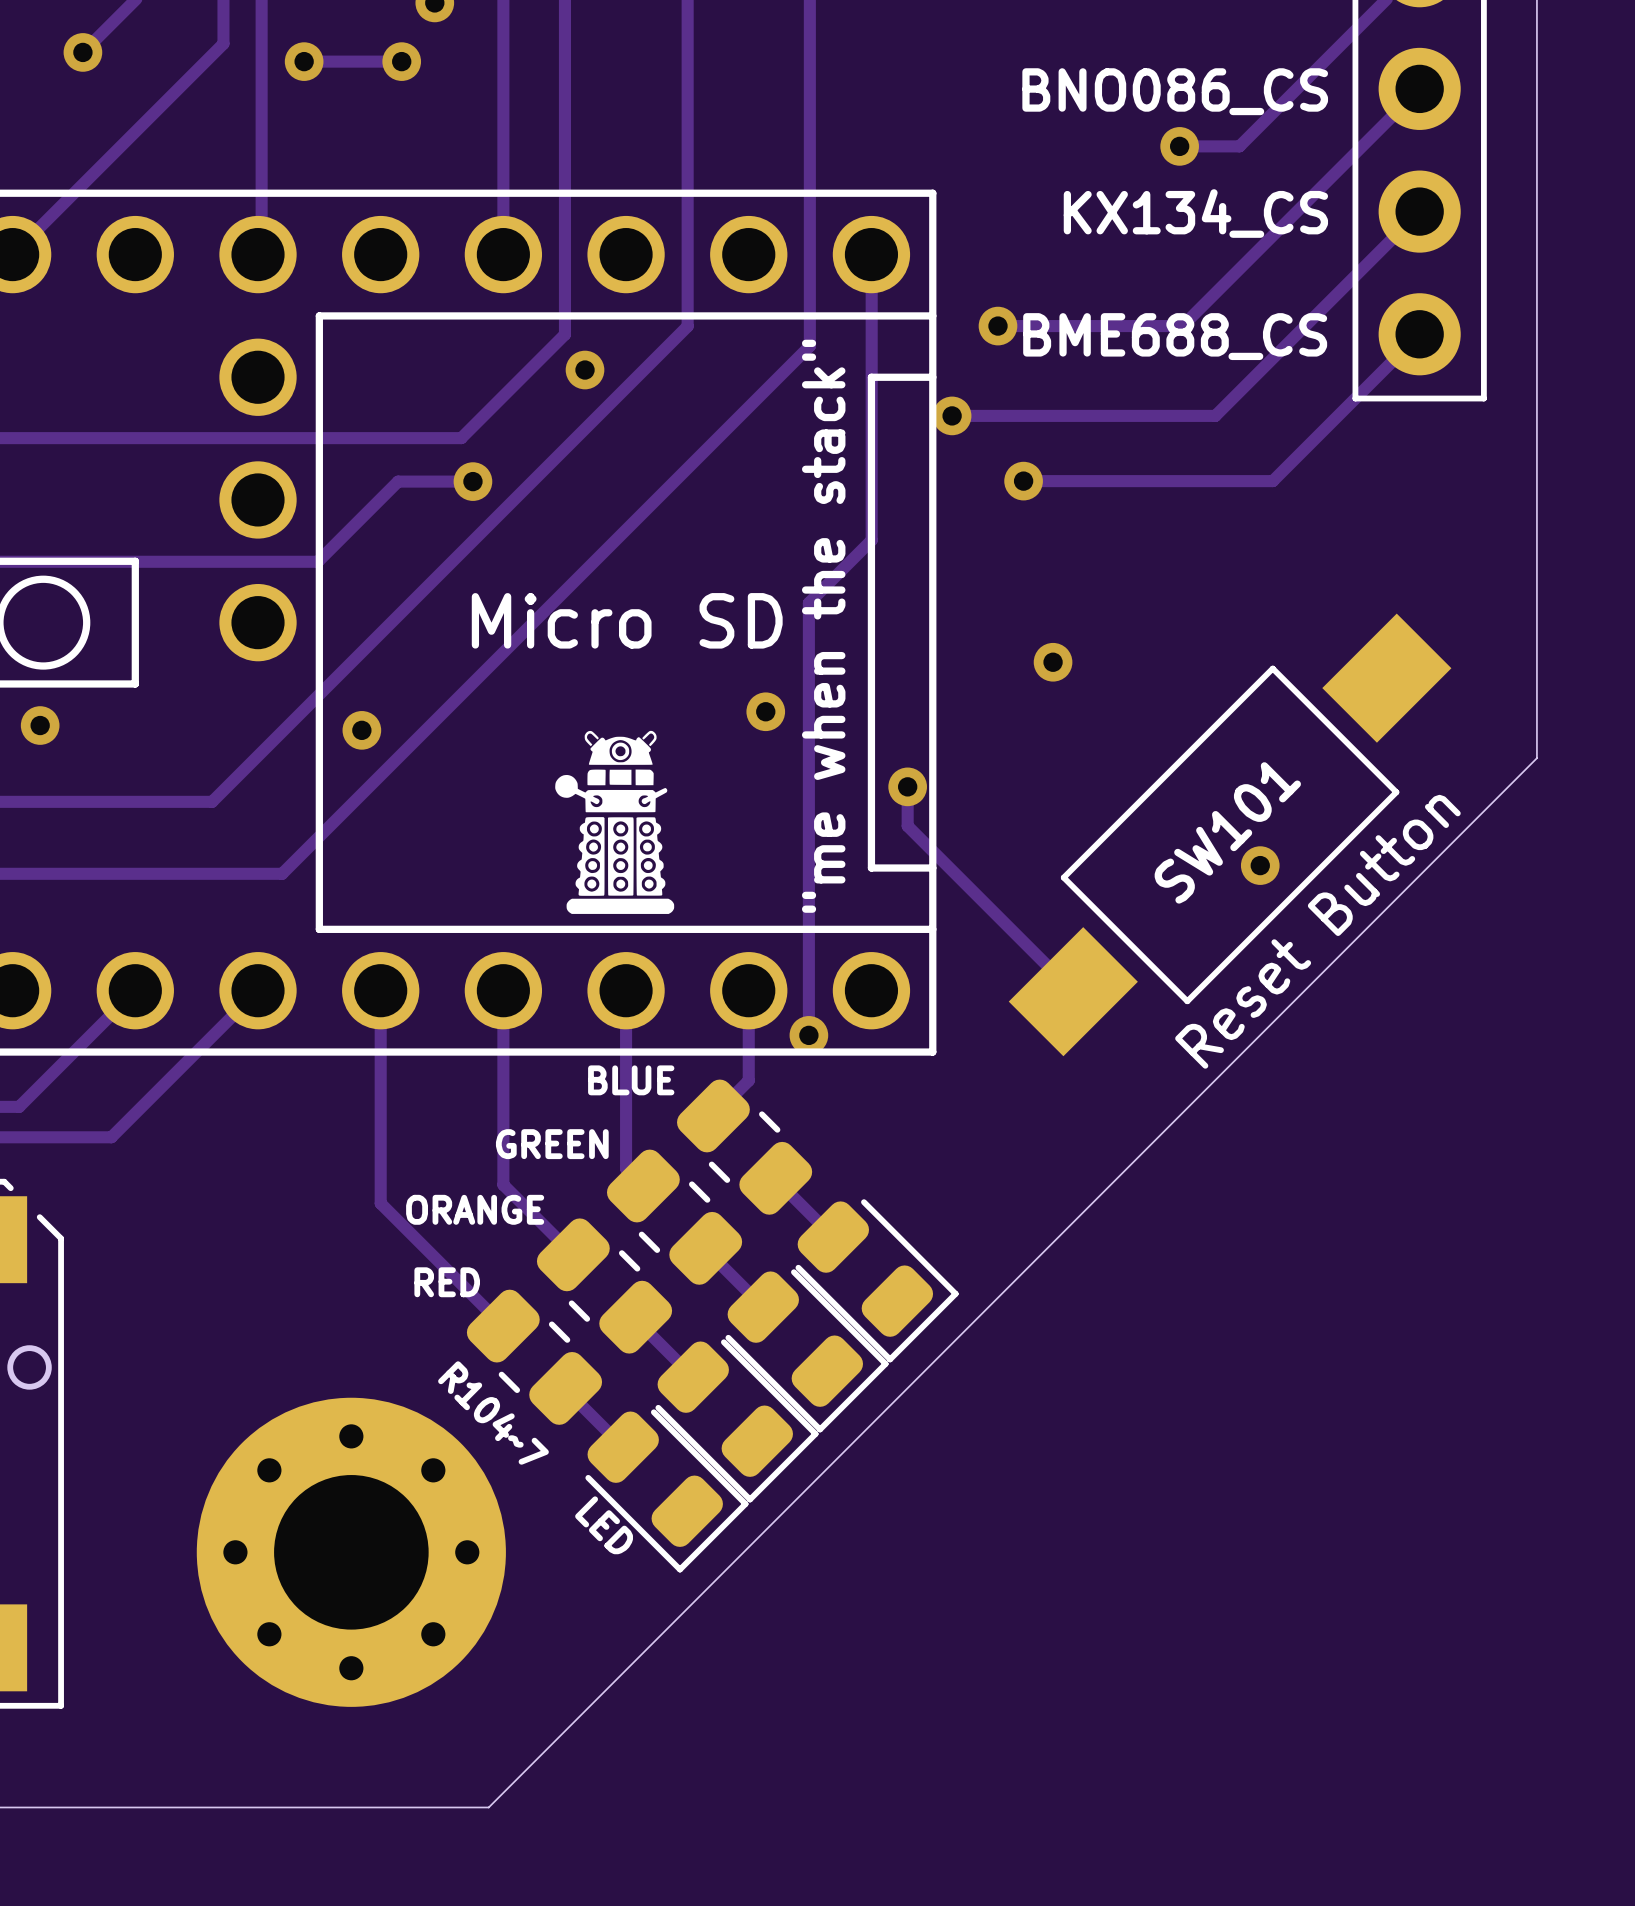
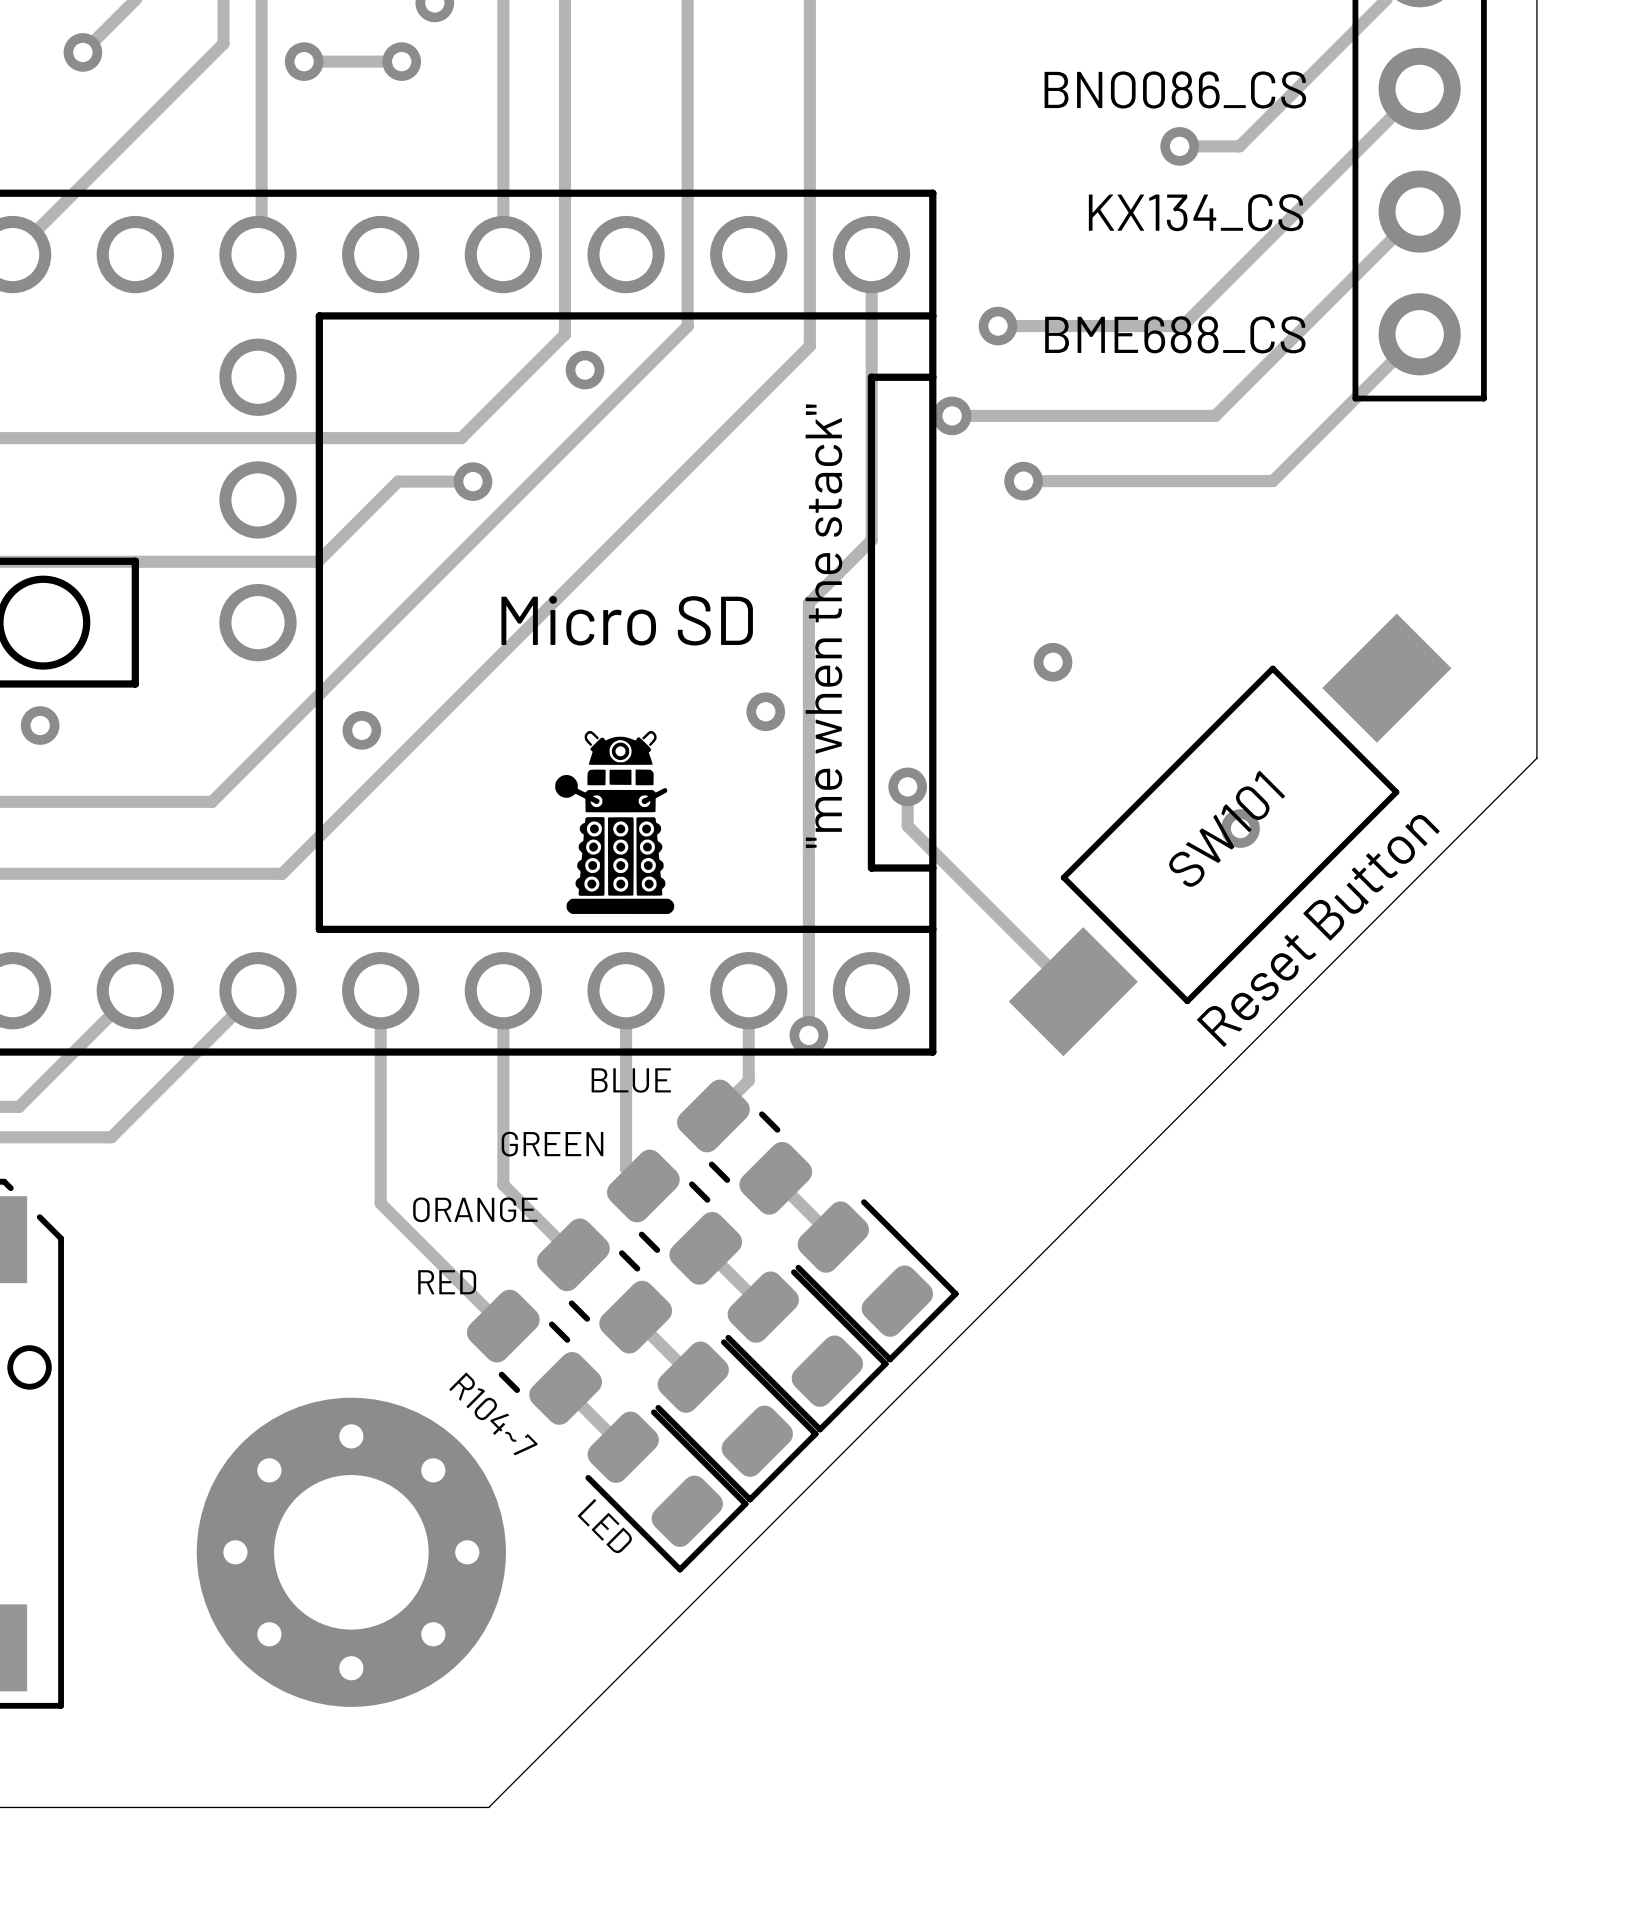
via position: (1260, 865) -> (1240, 828)

